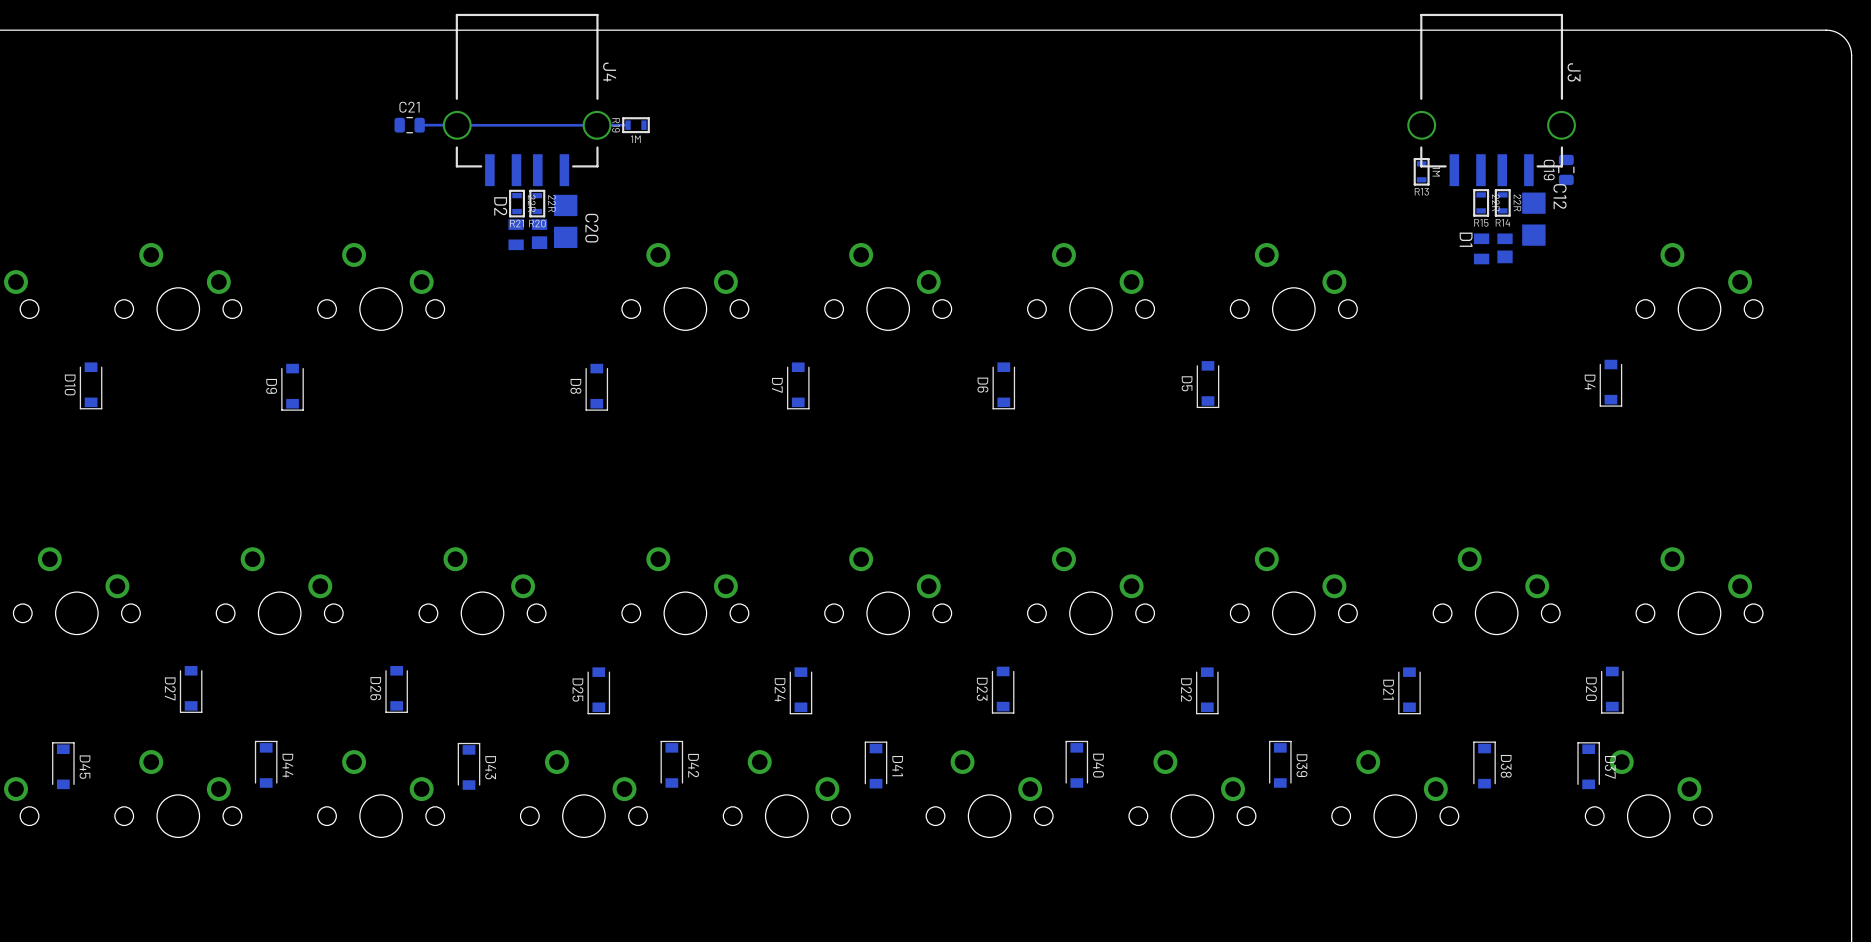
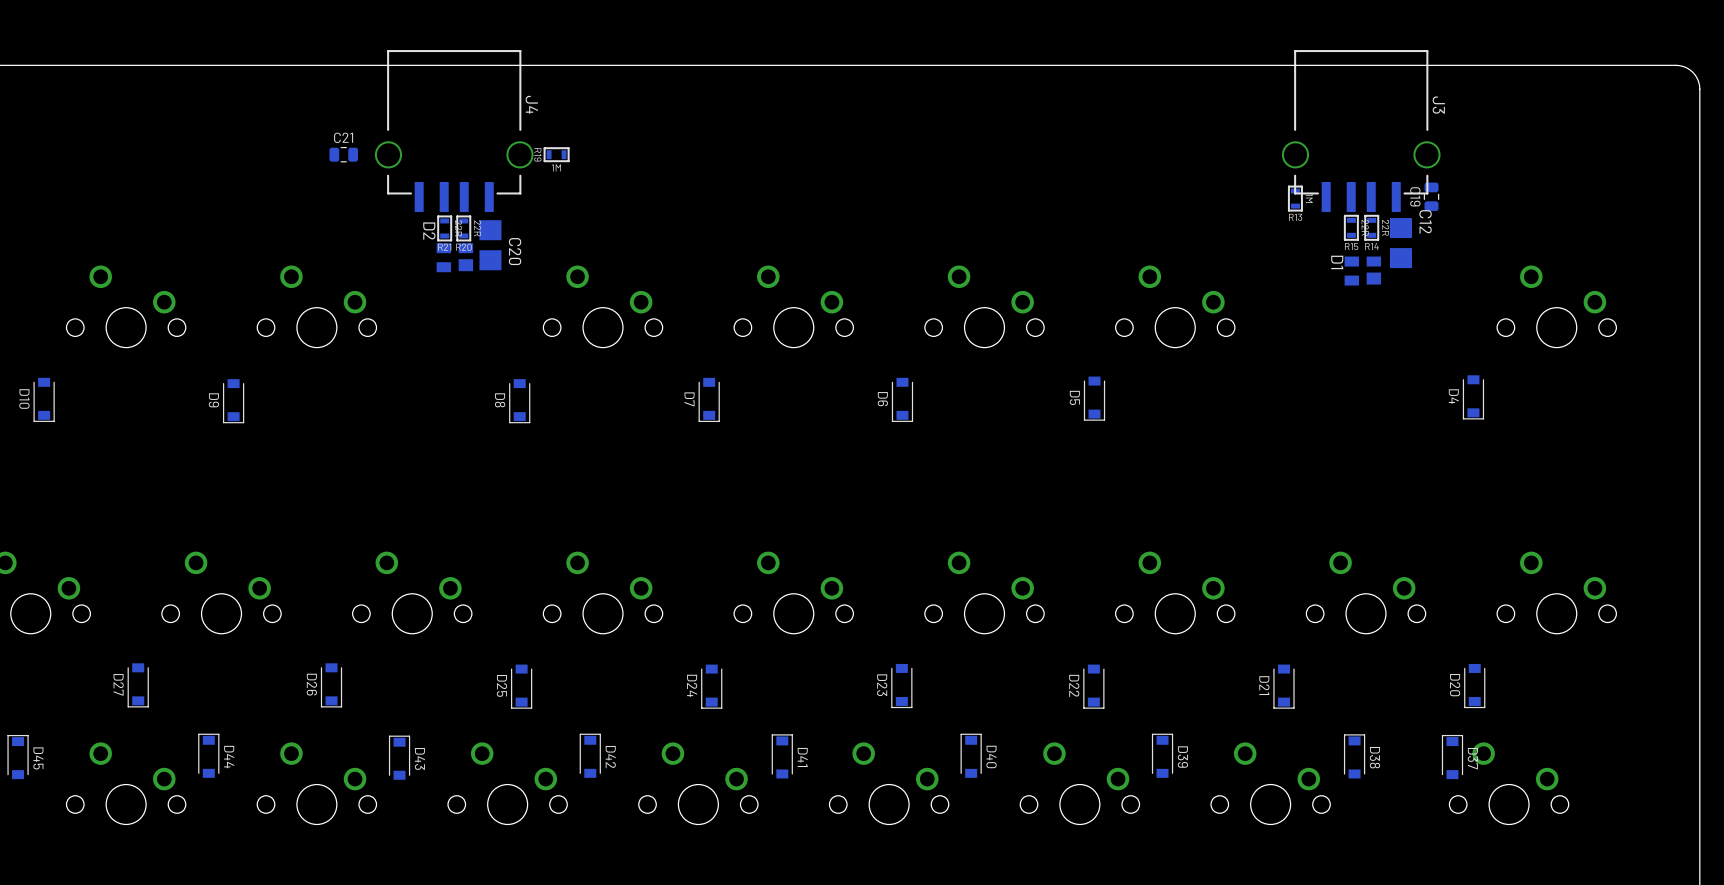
bottom track: (628, 125) (419, 125) -> none

